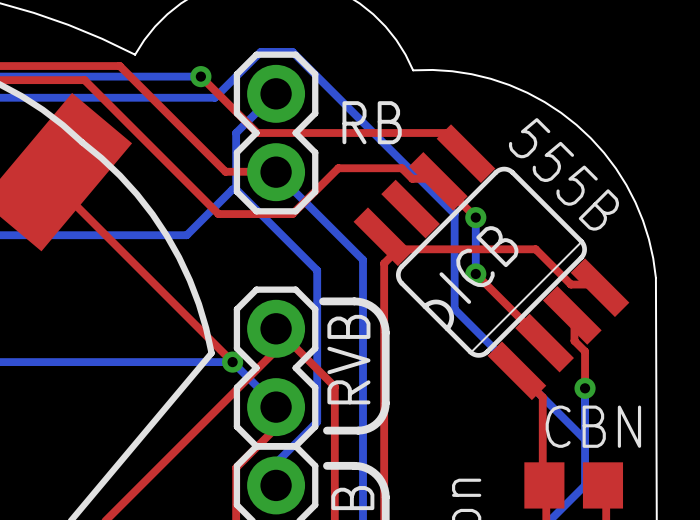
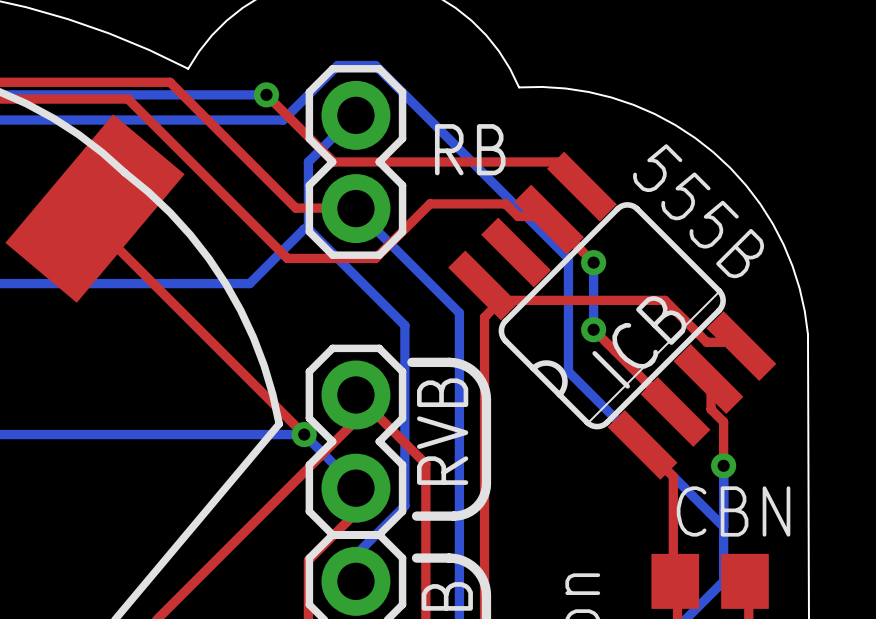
ICB name position: ICB (478, 265) -> ICB (639, 342)

